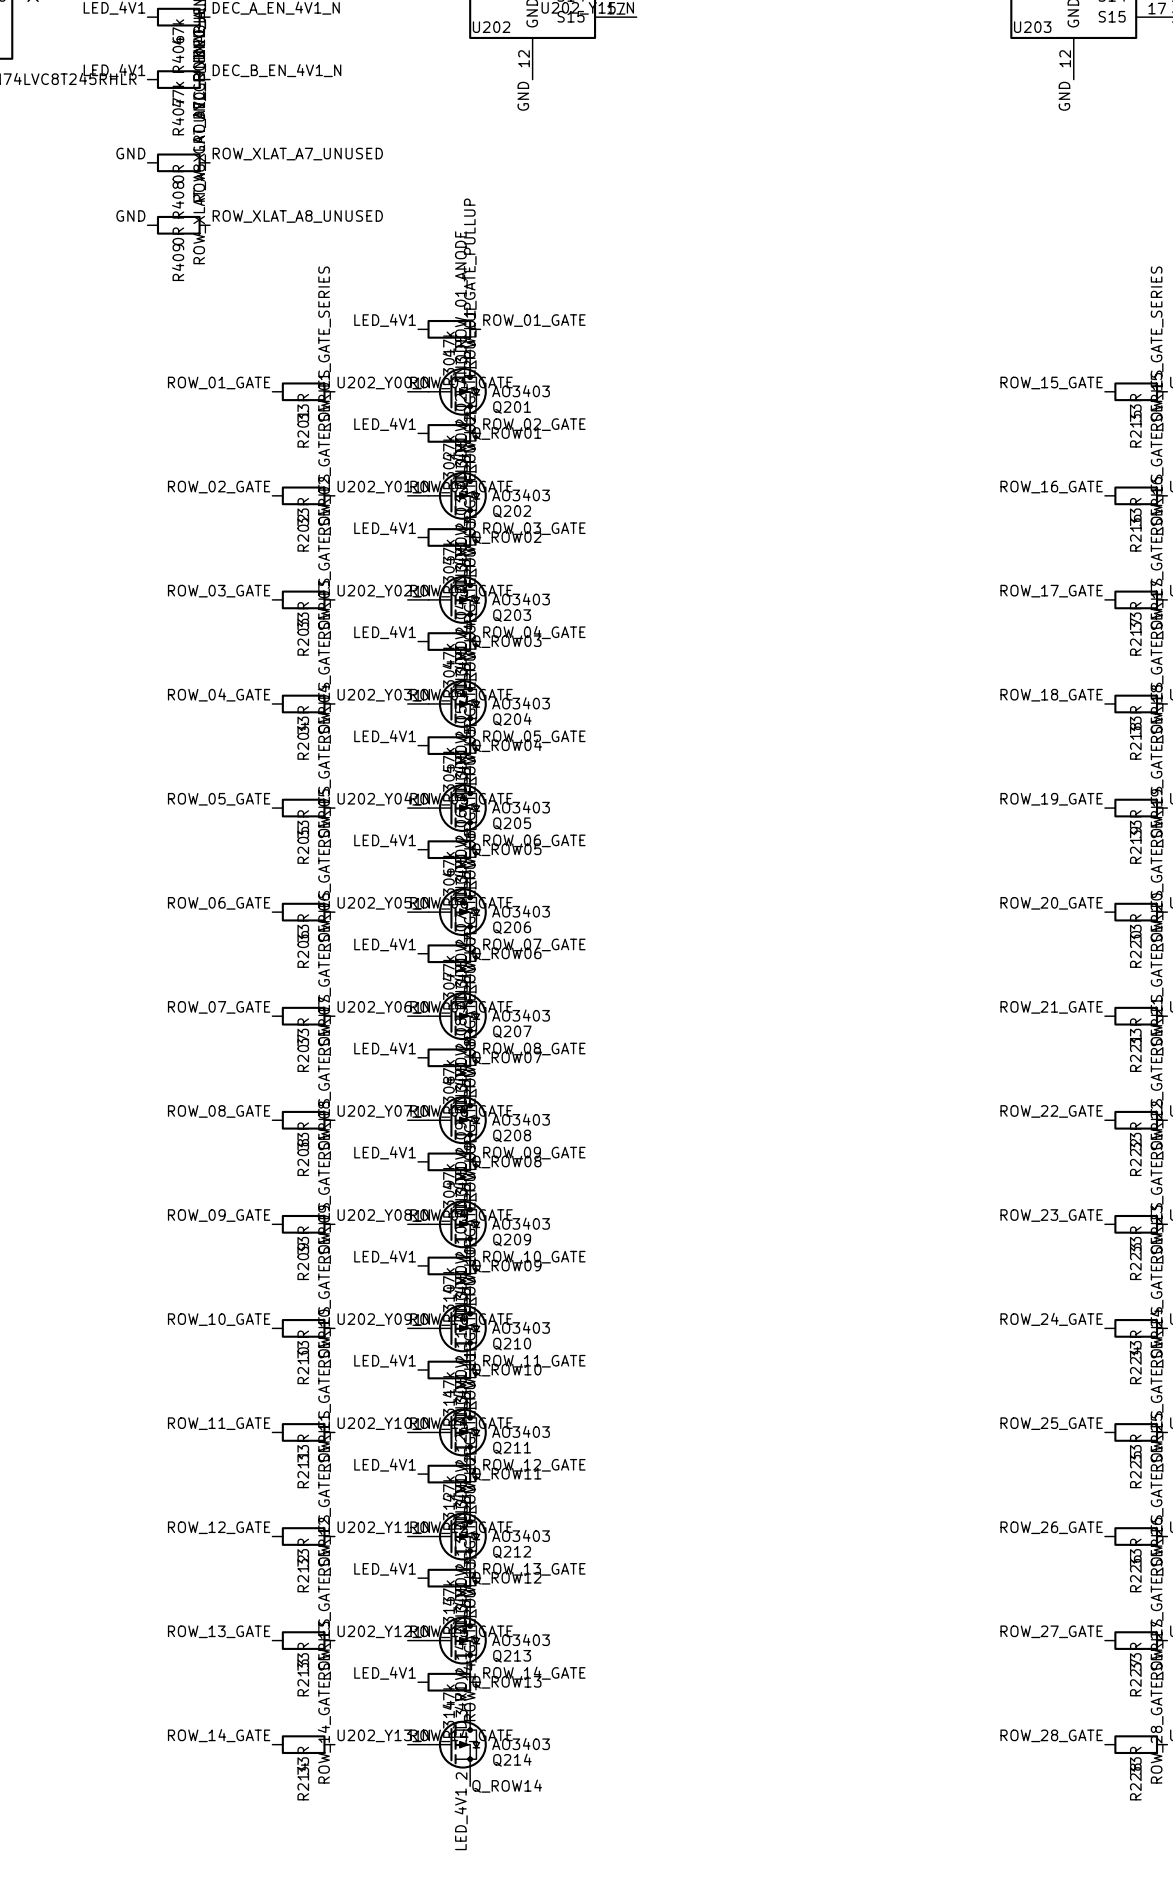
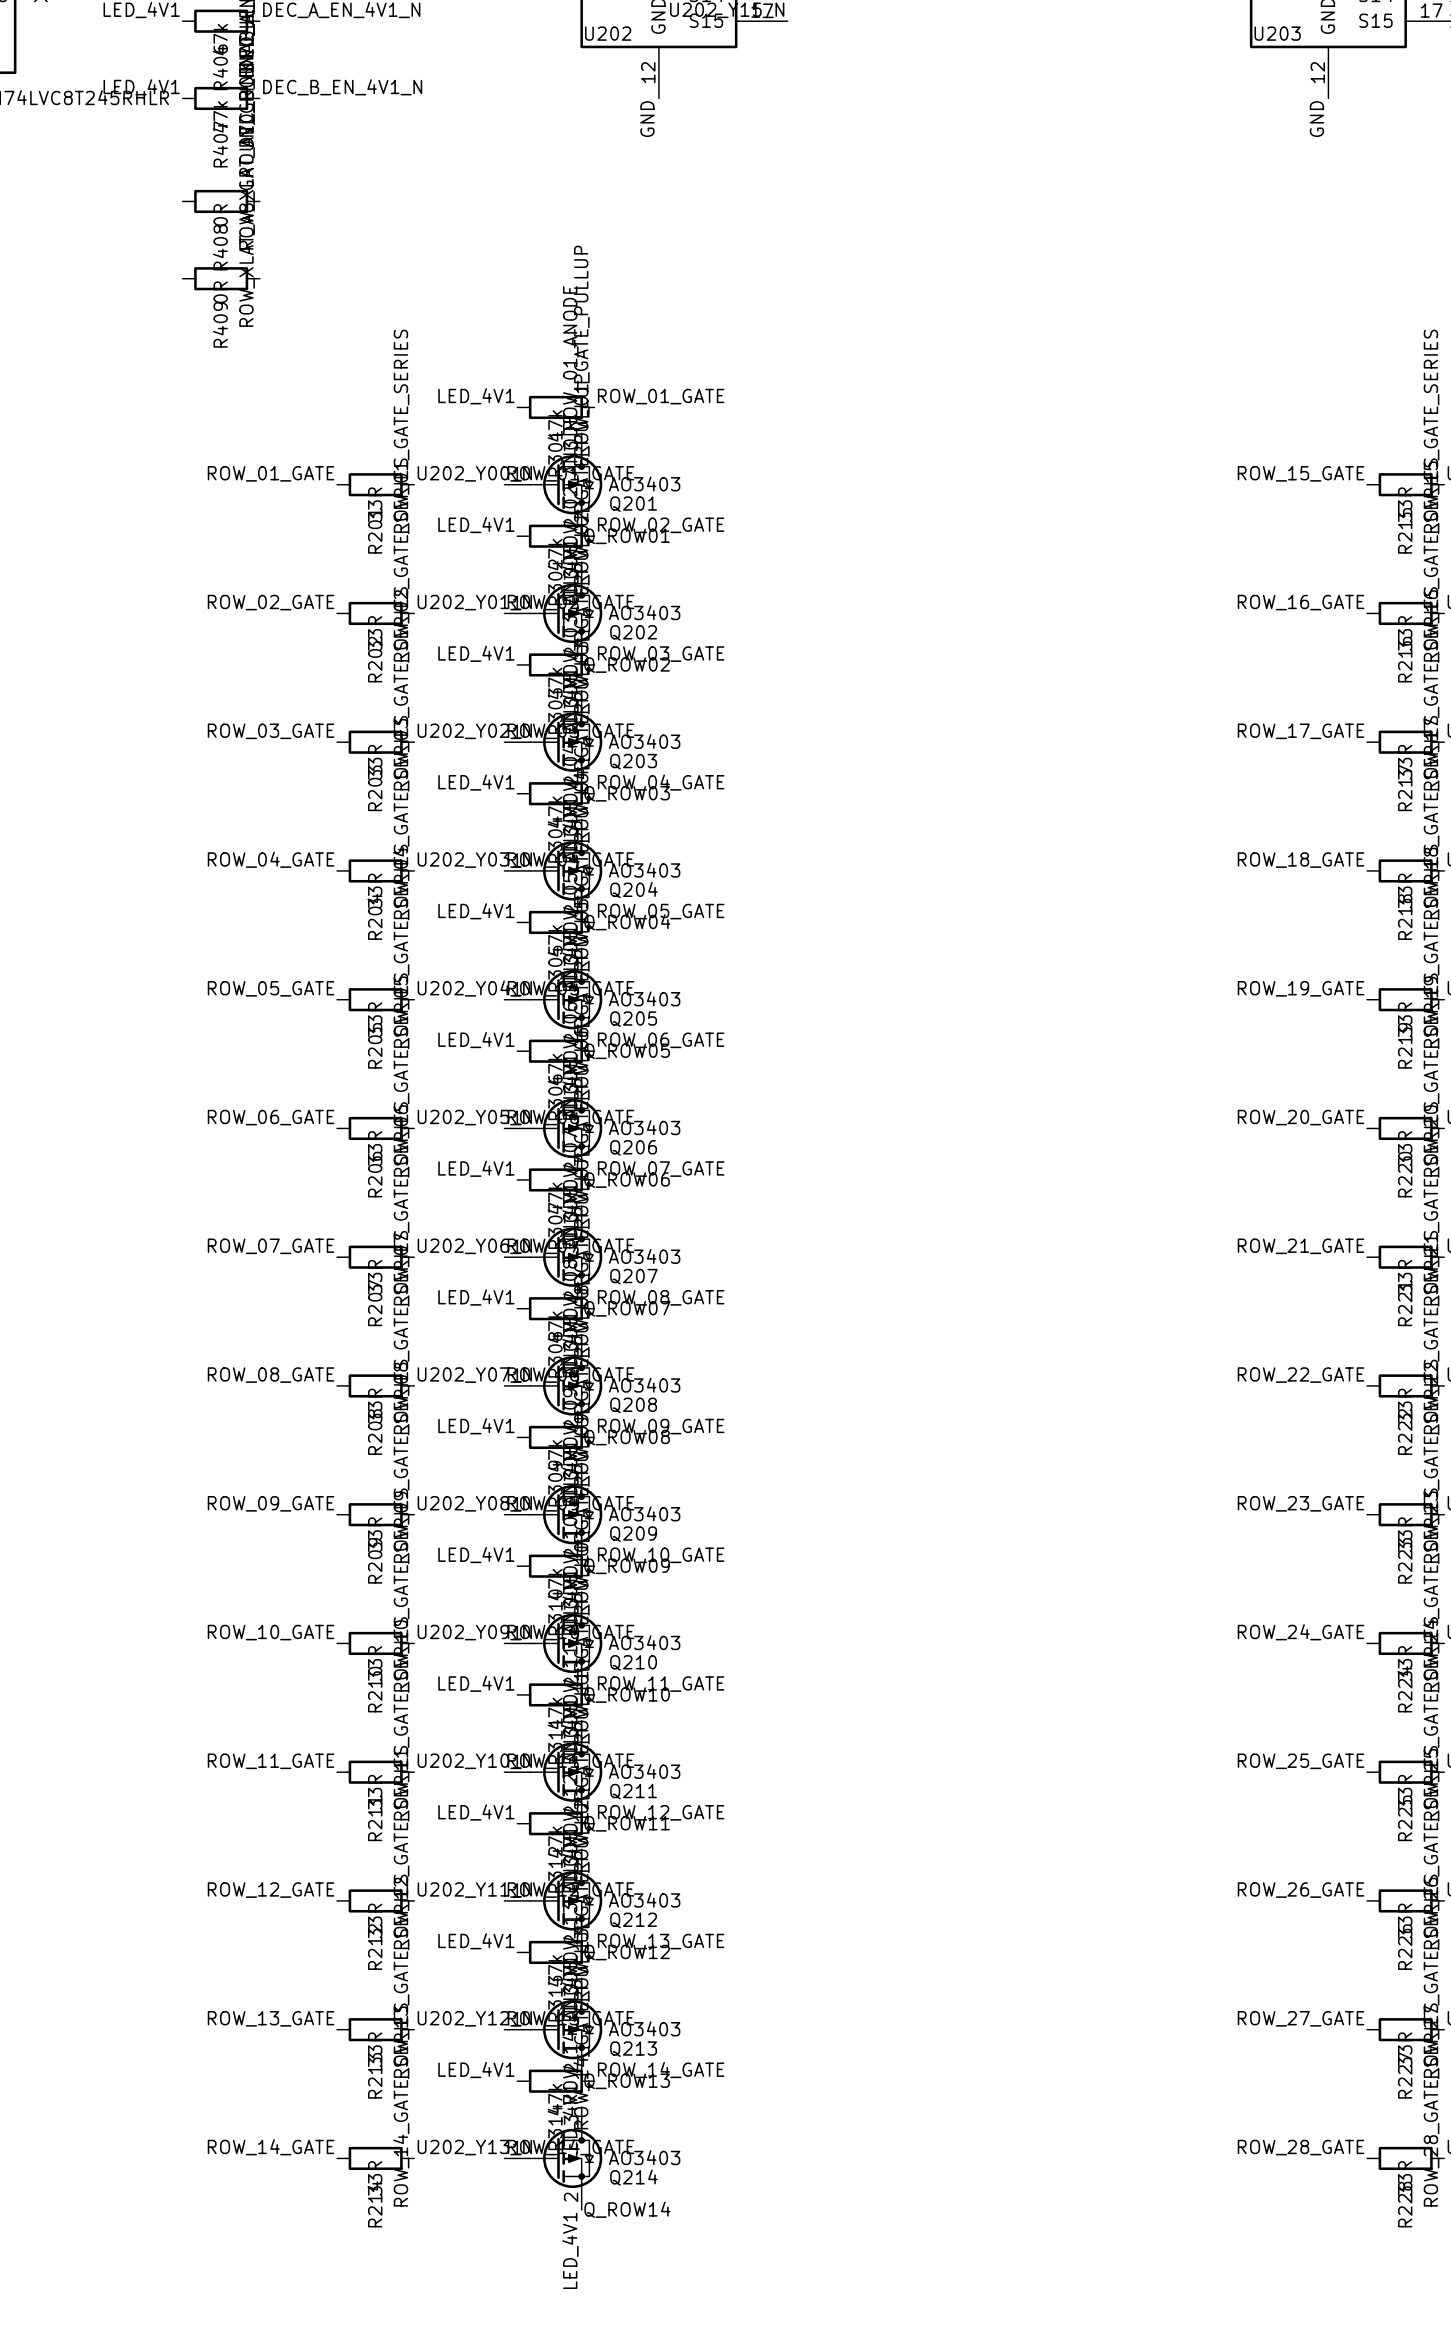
label: GND (130, 153) -> none
label: ROW_XLAT_A7_UNUSED (297, 154) -> none
label: GND (130, 215) -> none
label: ROW_XLAT_A8_UNUSED (297, 216) -> none

